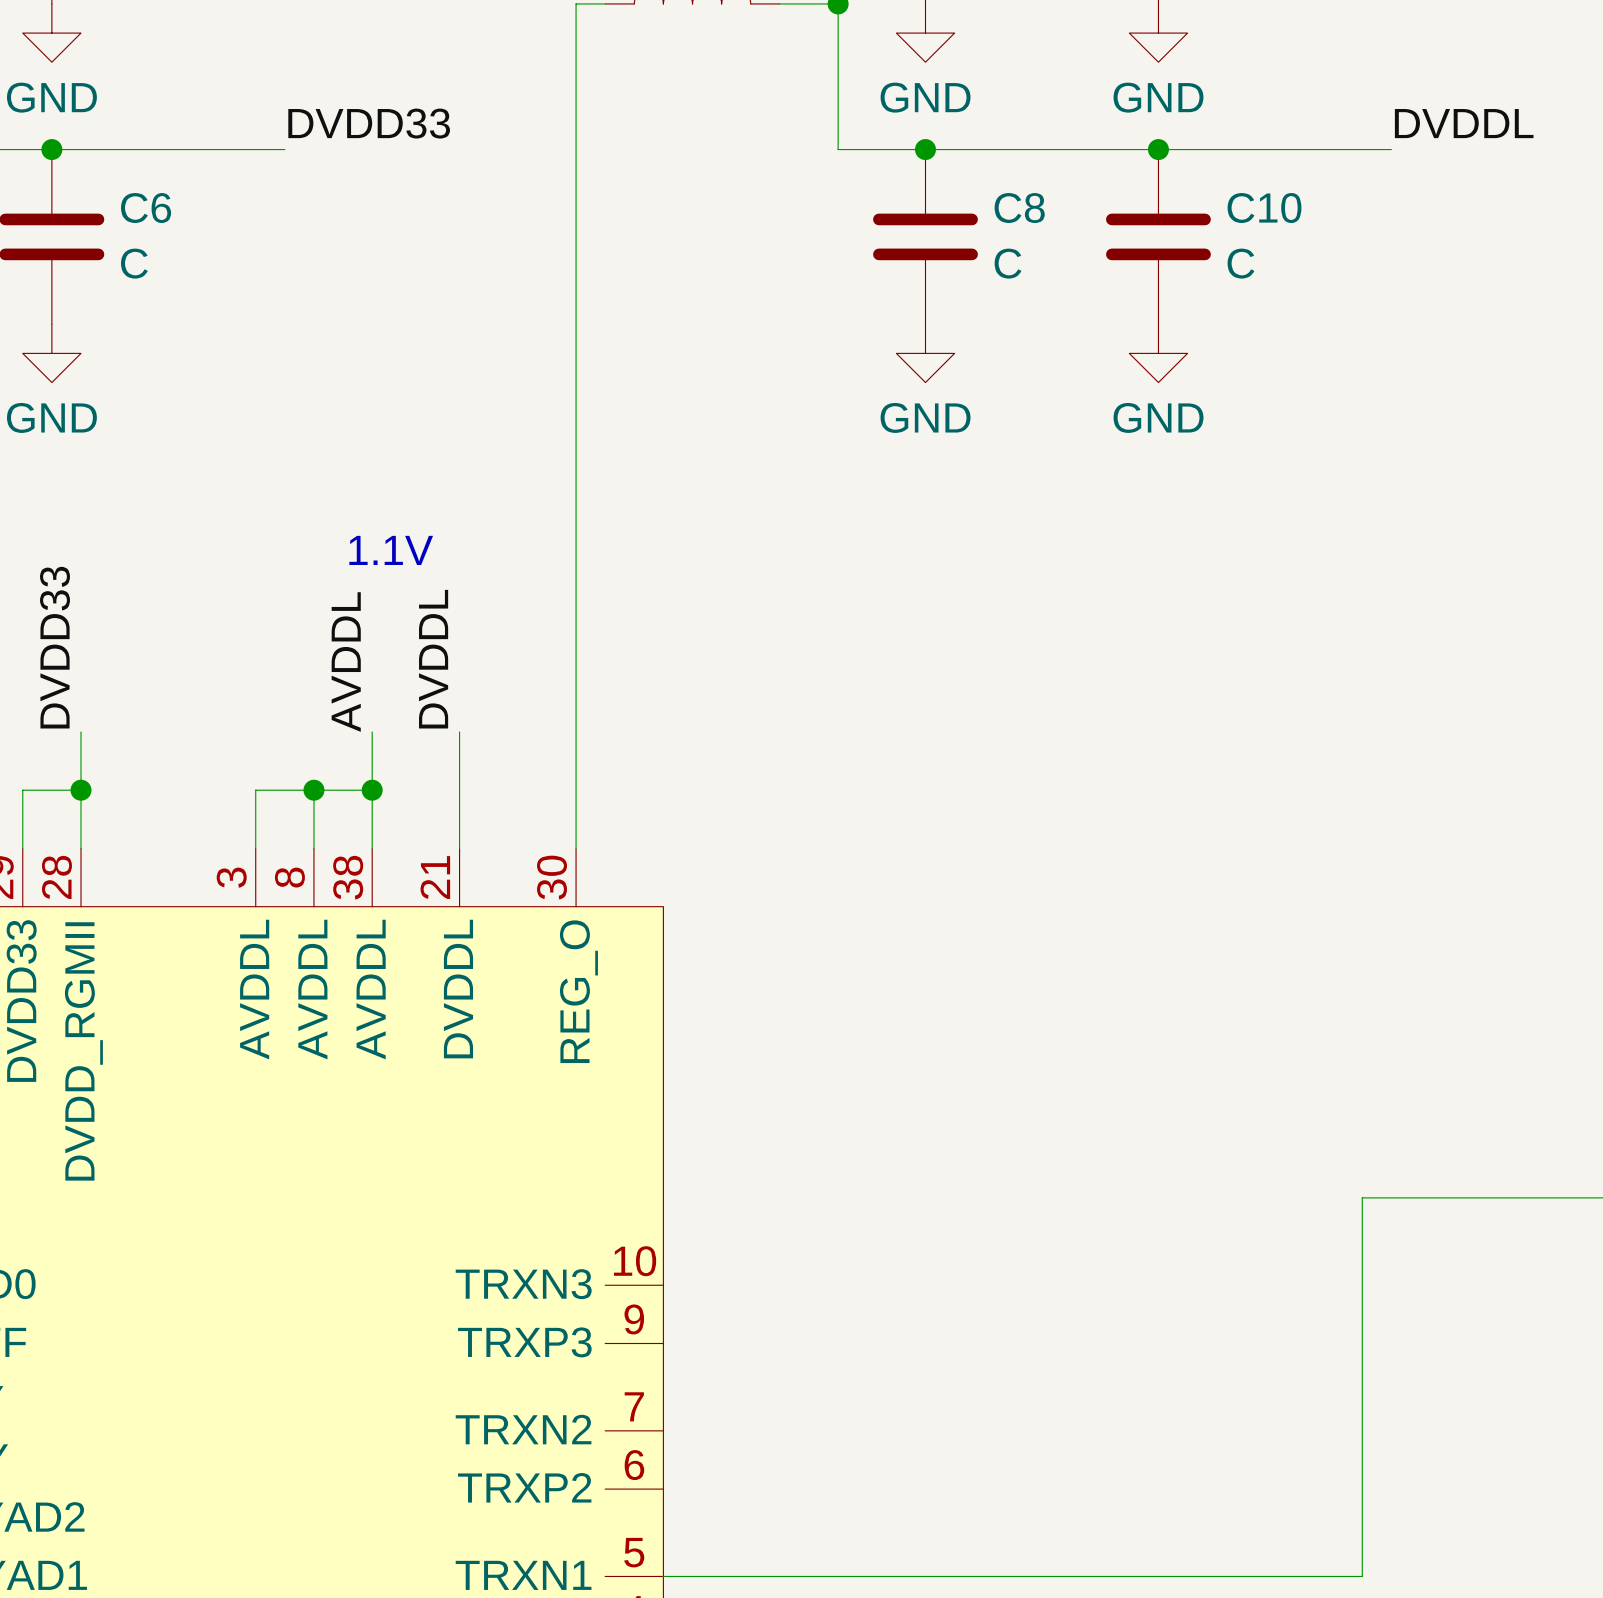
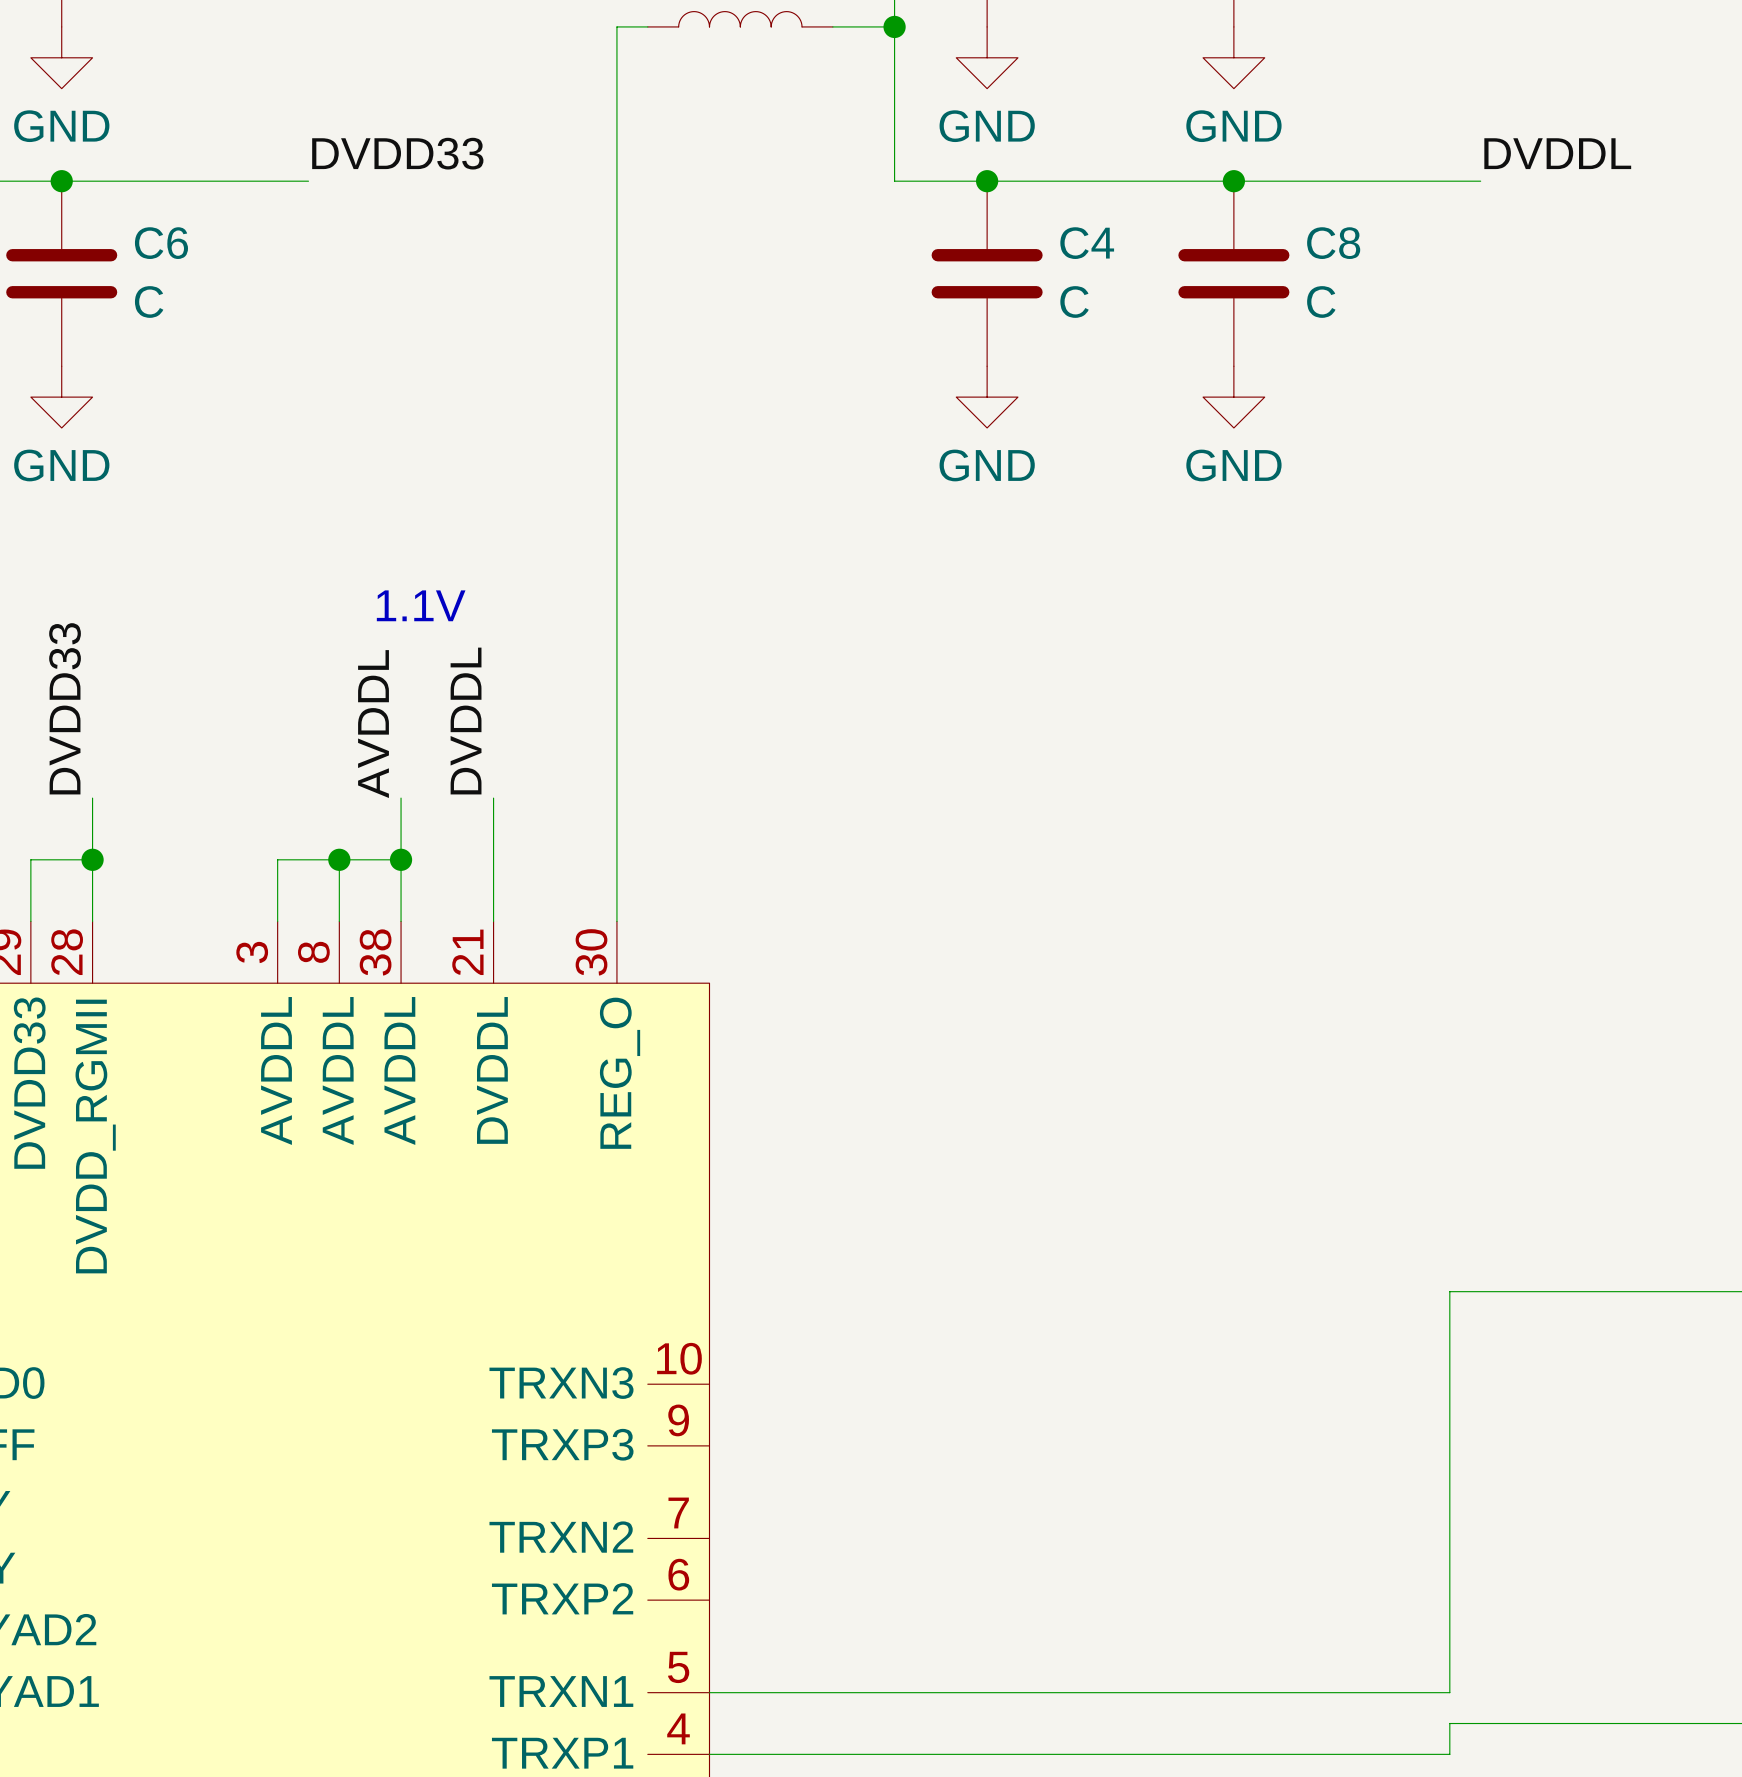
C8 name: C8 (1019, 208) -> C4 (1087, 243)
C10 name: C10 (1264, 208) -> C8 (1333, 243)

